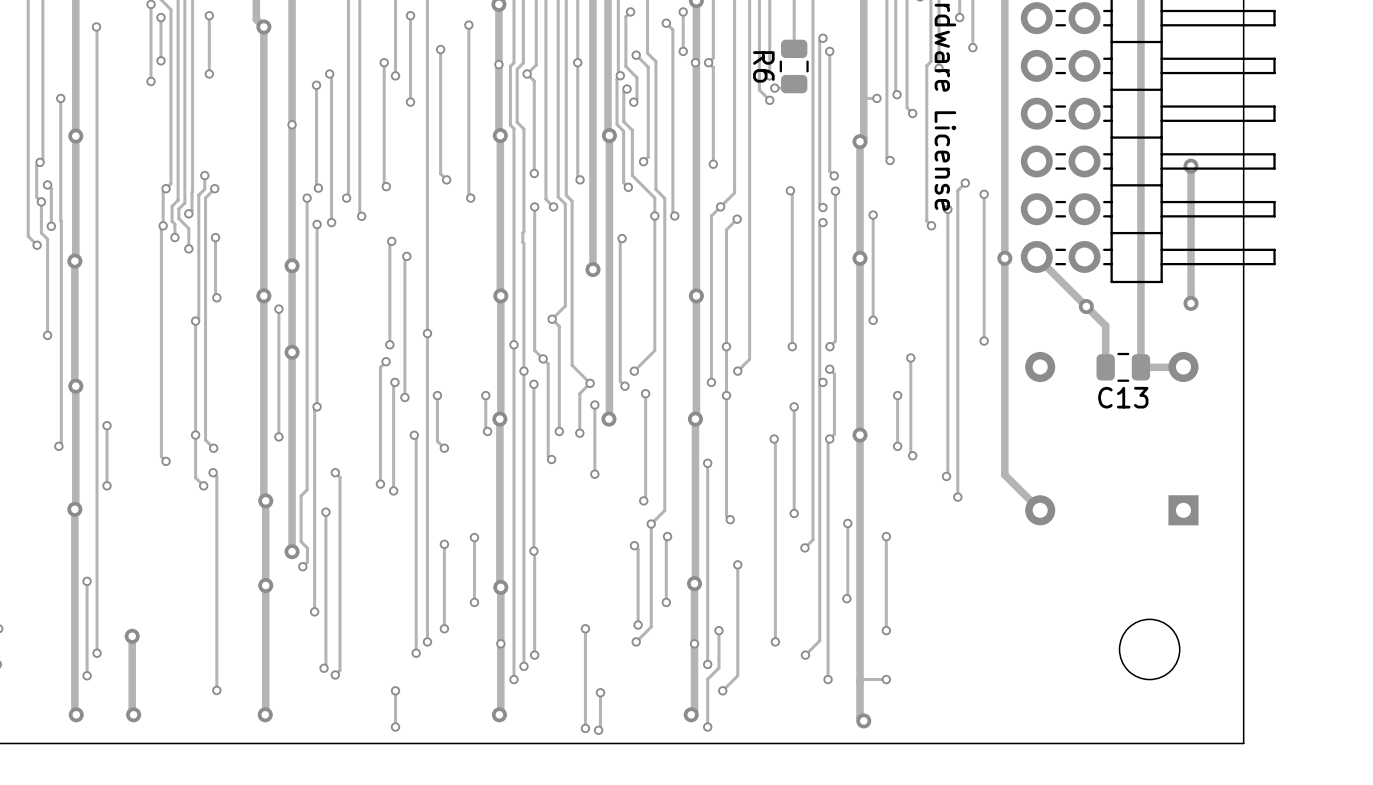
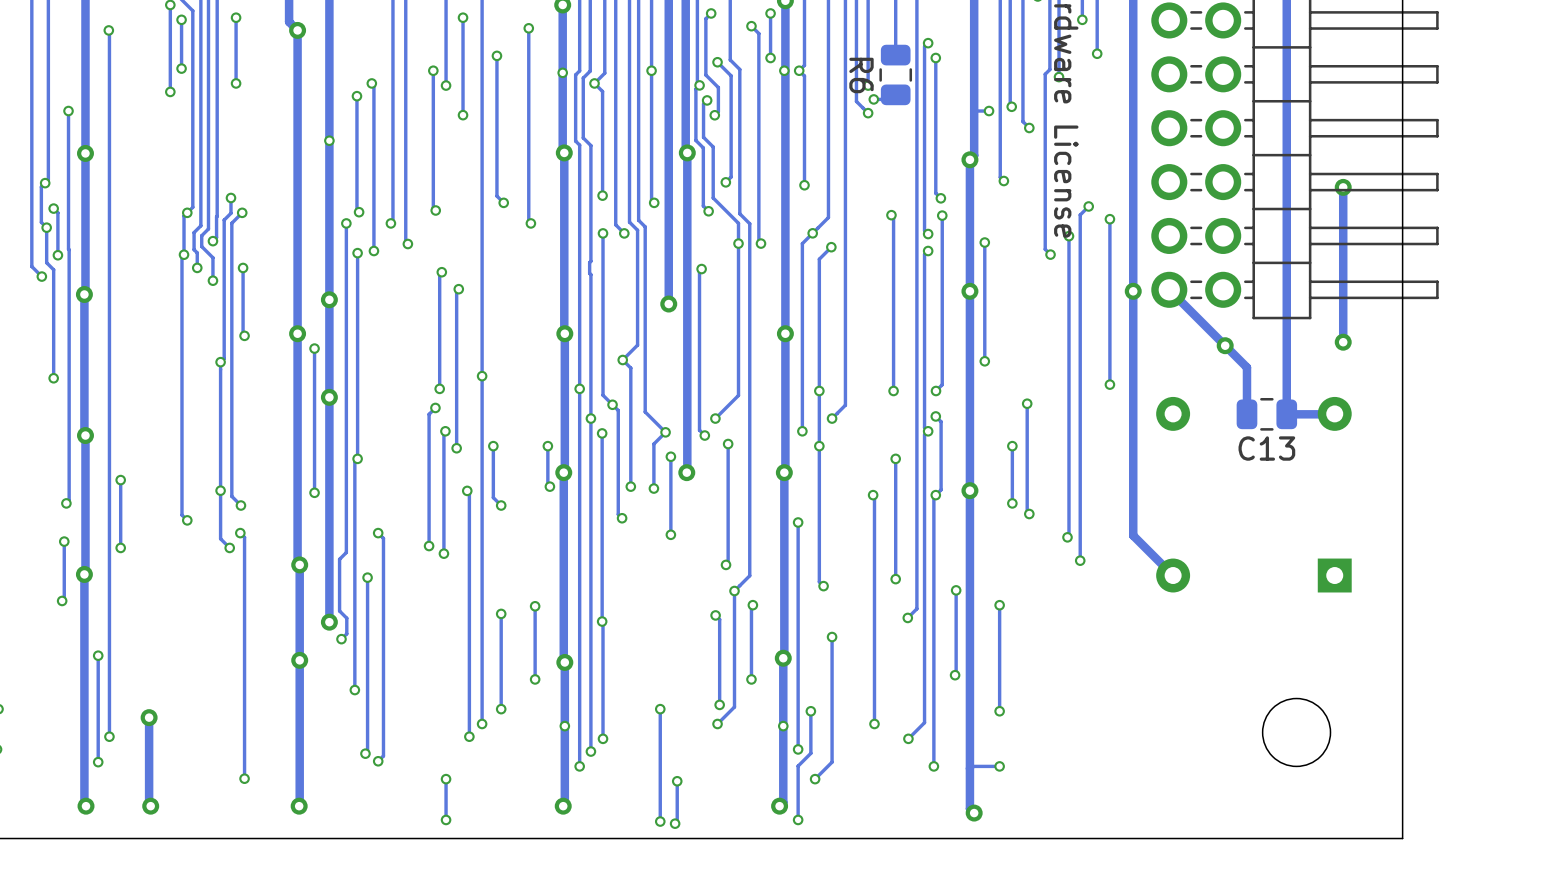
track: none -> (64, 541) (64, 598) (62, 600)
via: none -> (64, 541)
via: none -> (62, 600)

